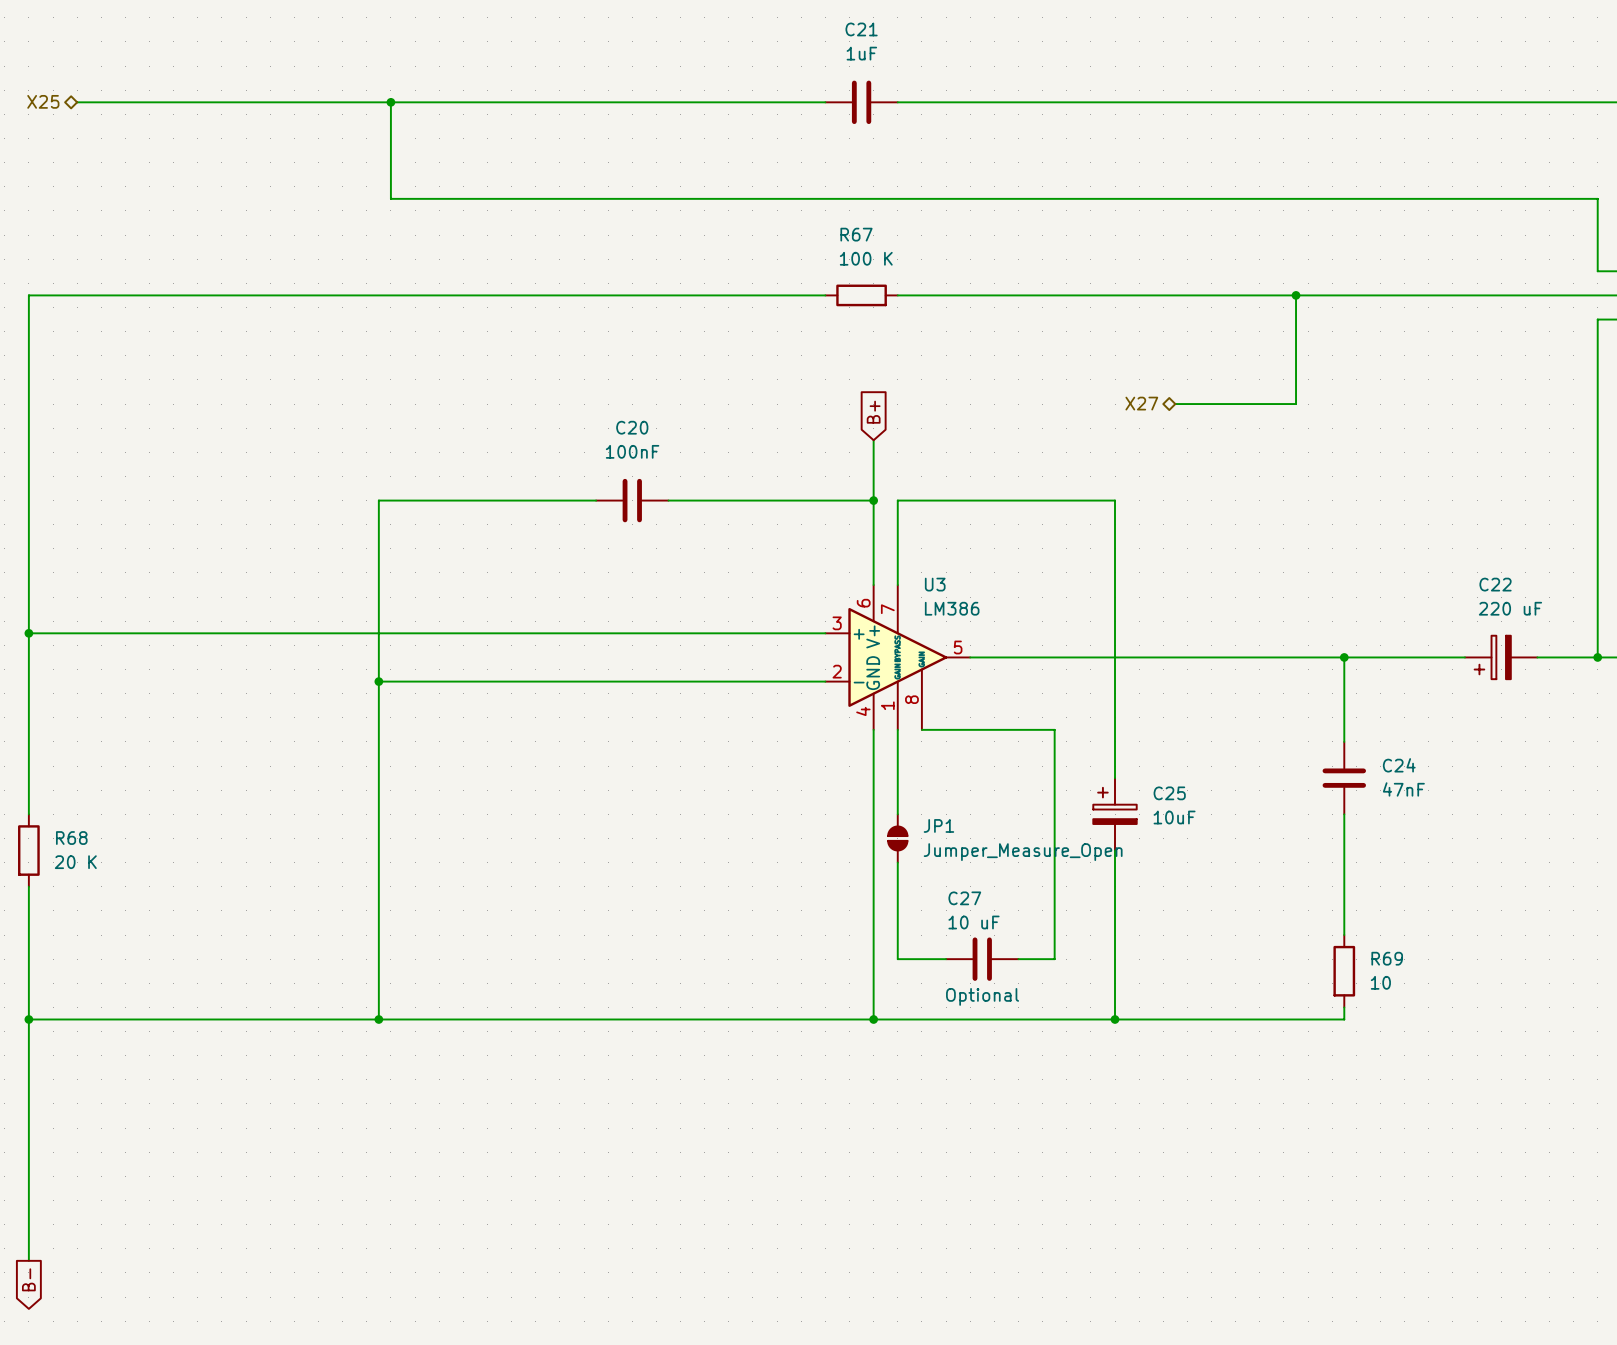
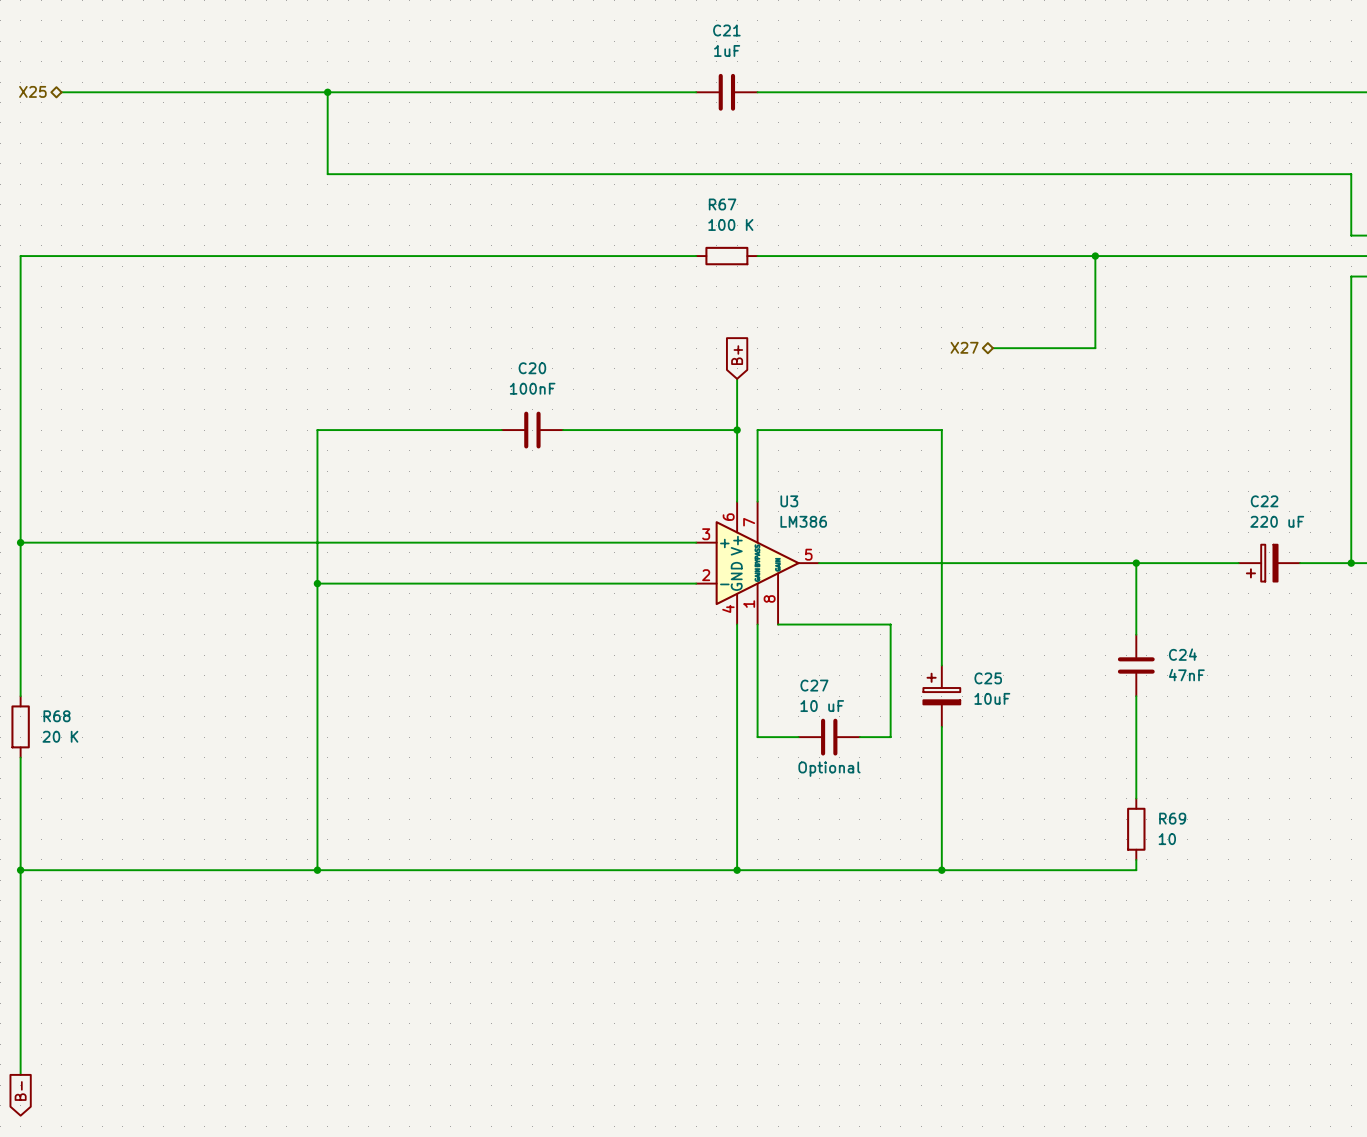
wire: none -> (757, 696) (757, 737) (798, 737)
JP1: Jumper_Measure_Open (897, 838) -> none
wire: (897, 862) (897, 959) (946, 959) -> none
wire: (1054, 862) (1054, 959) (1018, 959) -> (890, 737) (859, 737)
C27 position: (982, 959) -> (829, 737)

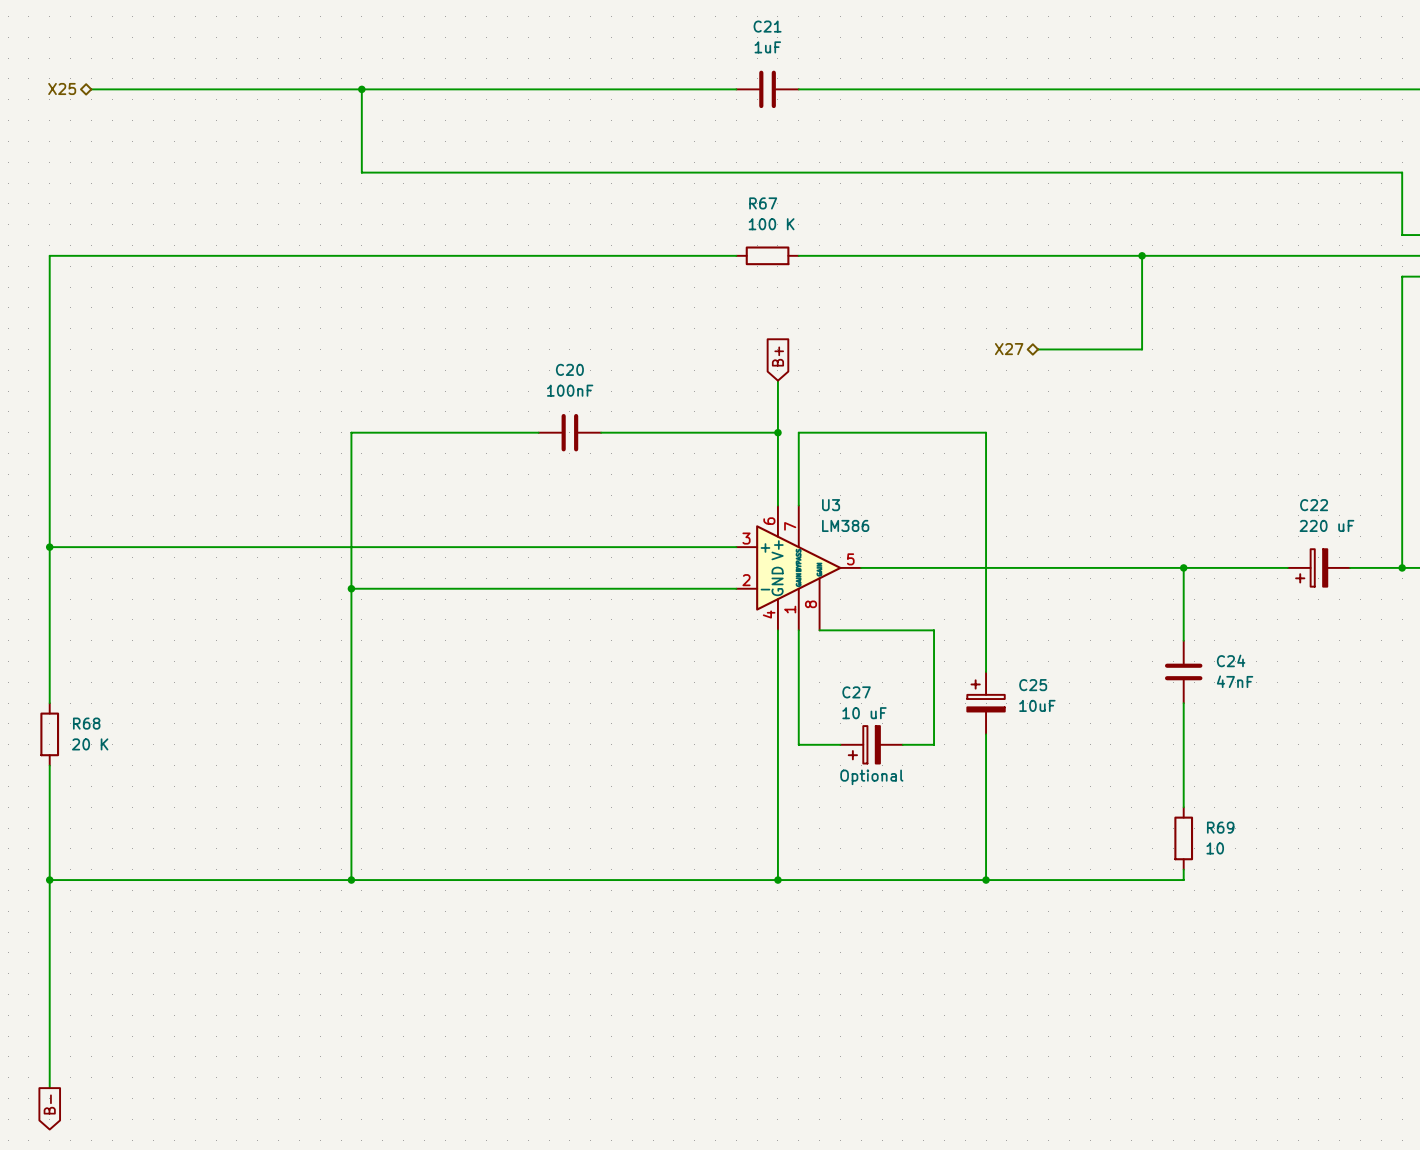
C27 symbol: [798, 718, 860, 756] -> [840, 726, 903, 764]

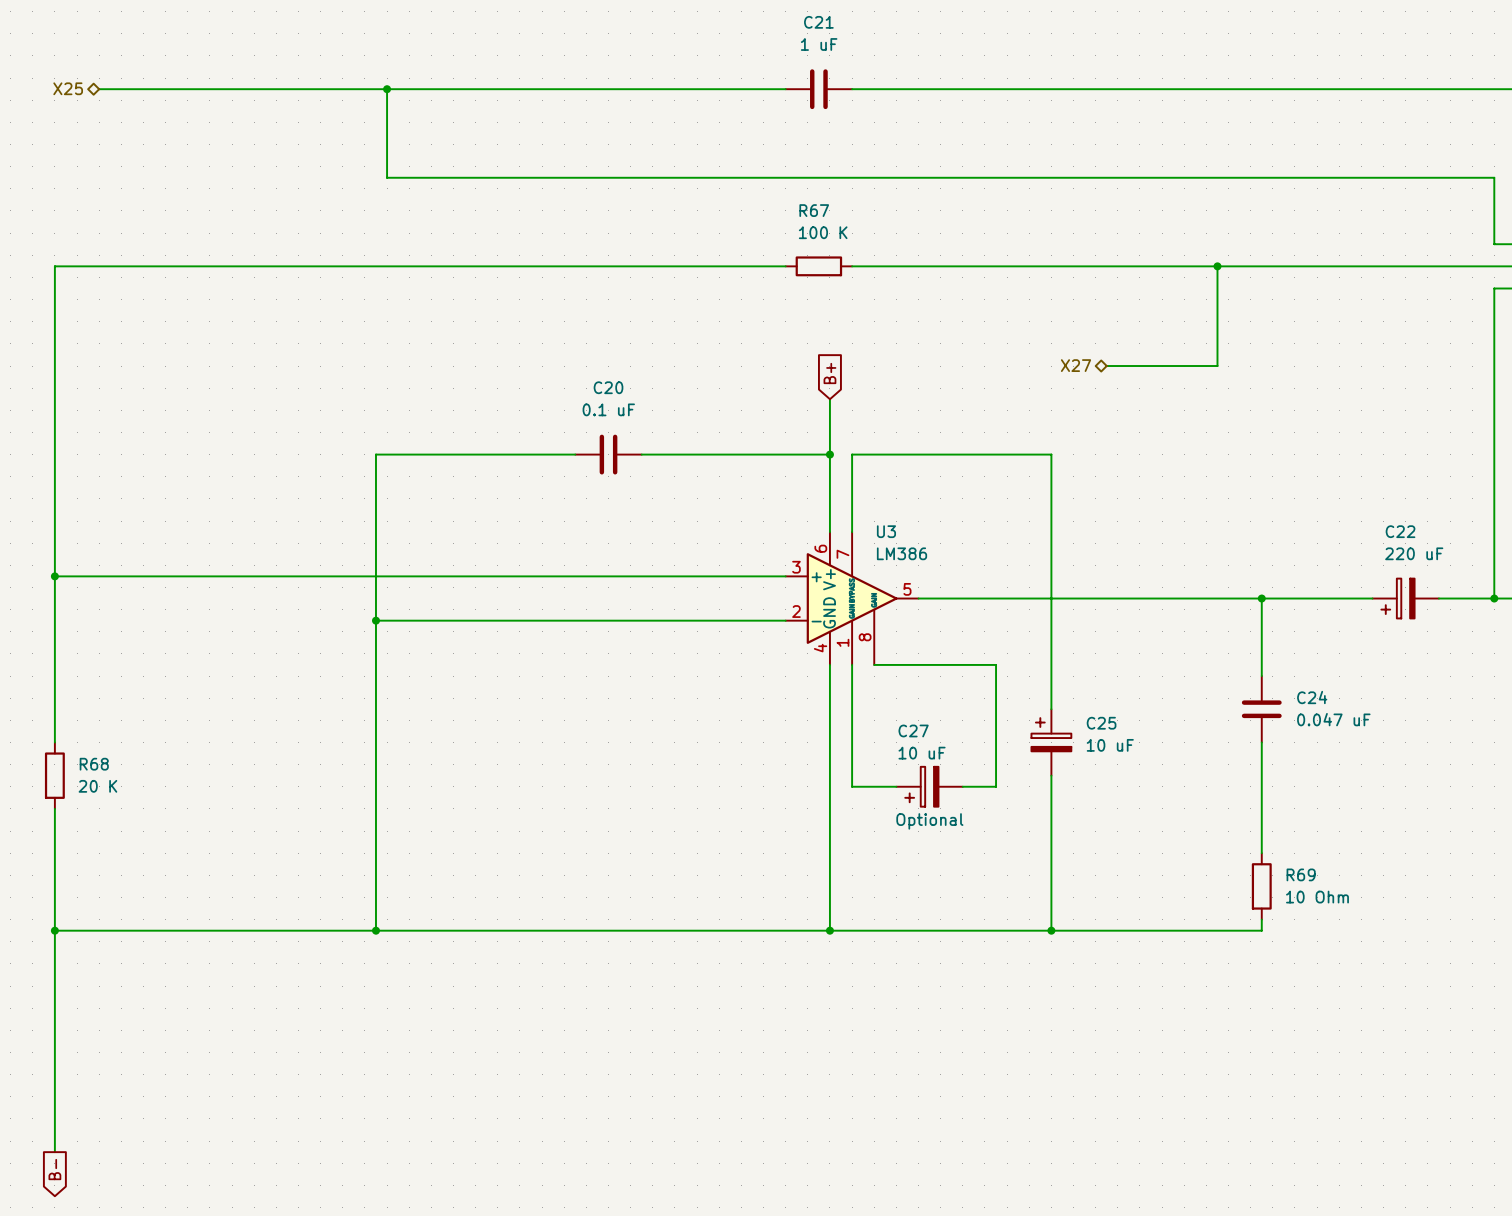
C21 value: 1uF (767, 47) -> 1 uF (819, 44)
C20 value: 100nF (570, 390) -> 0.1 uF (608, 409)
C24 value: 47nF (1235, 681) -> 0.047 uF (1333, 719)
C25 value: 10uF (1037, 705) -> 10 uF (1110, 745)
R69 value: 10 (1215, 848) -> 10 Ohm (1317, 897)

